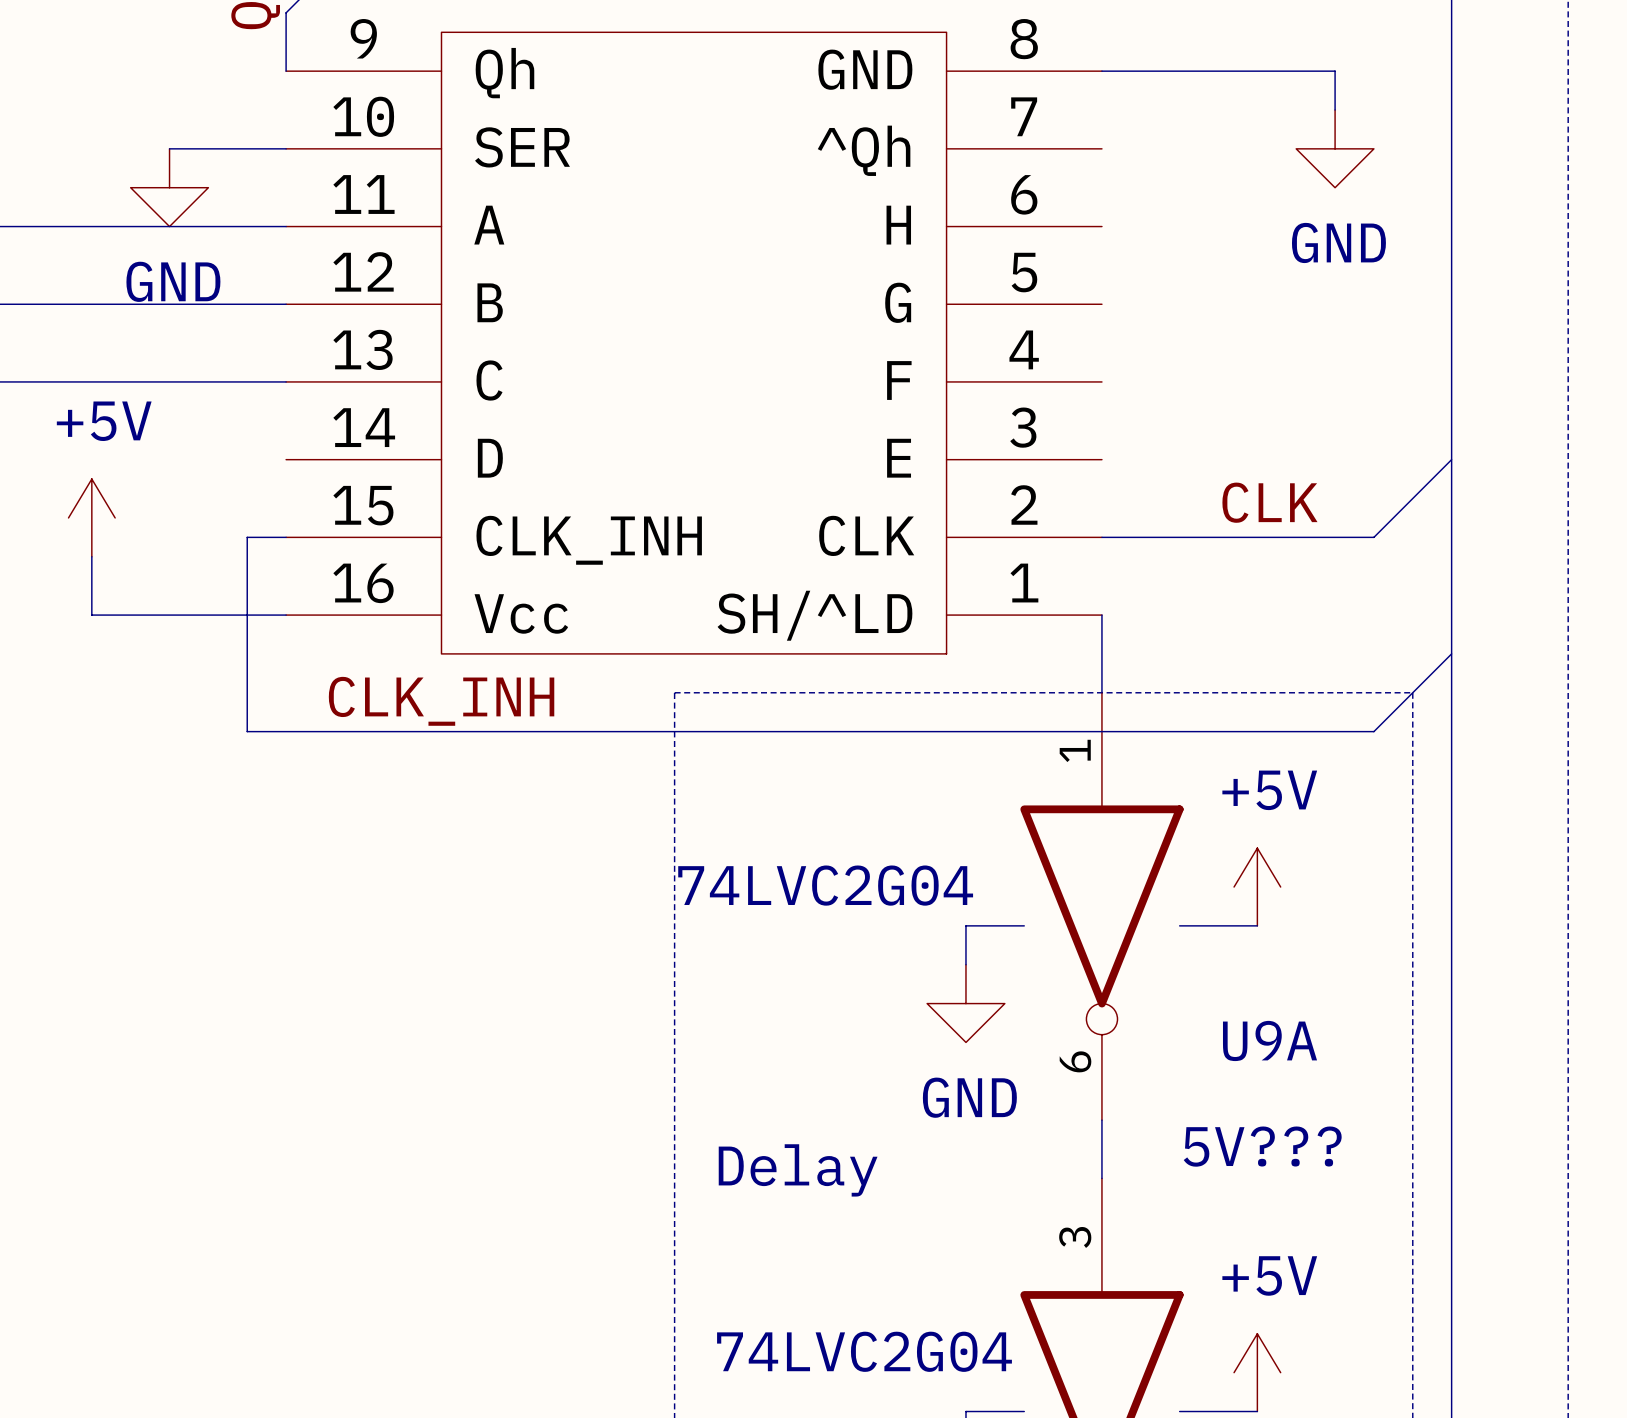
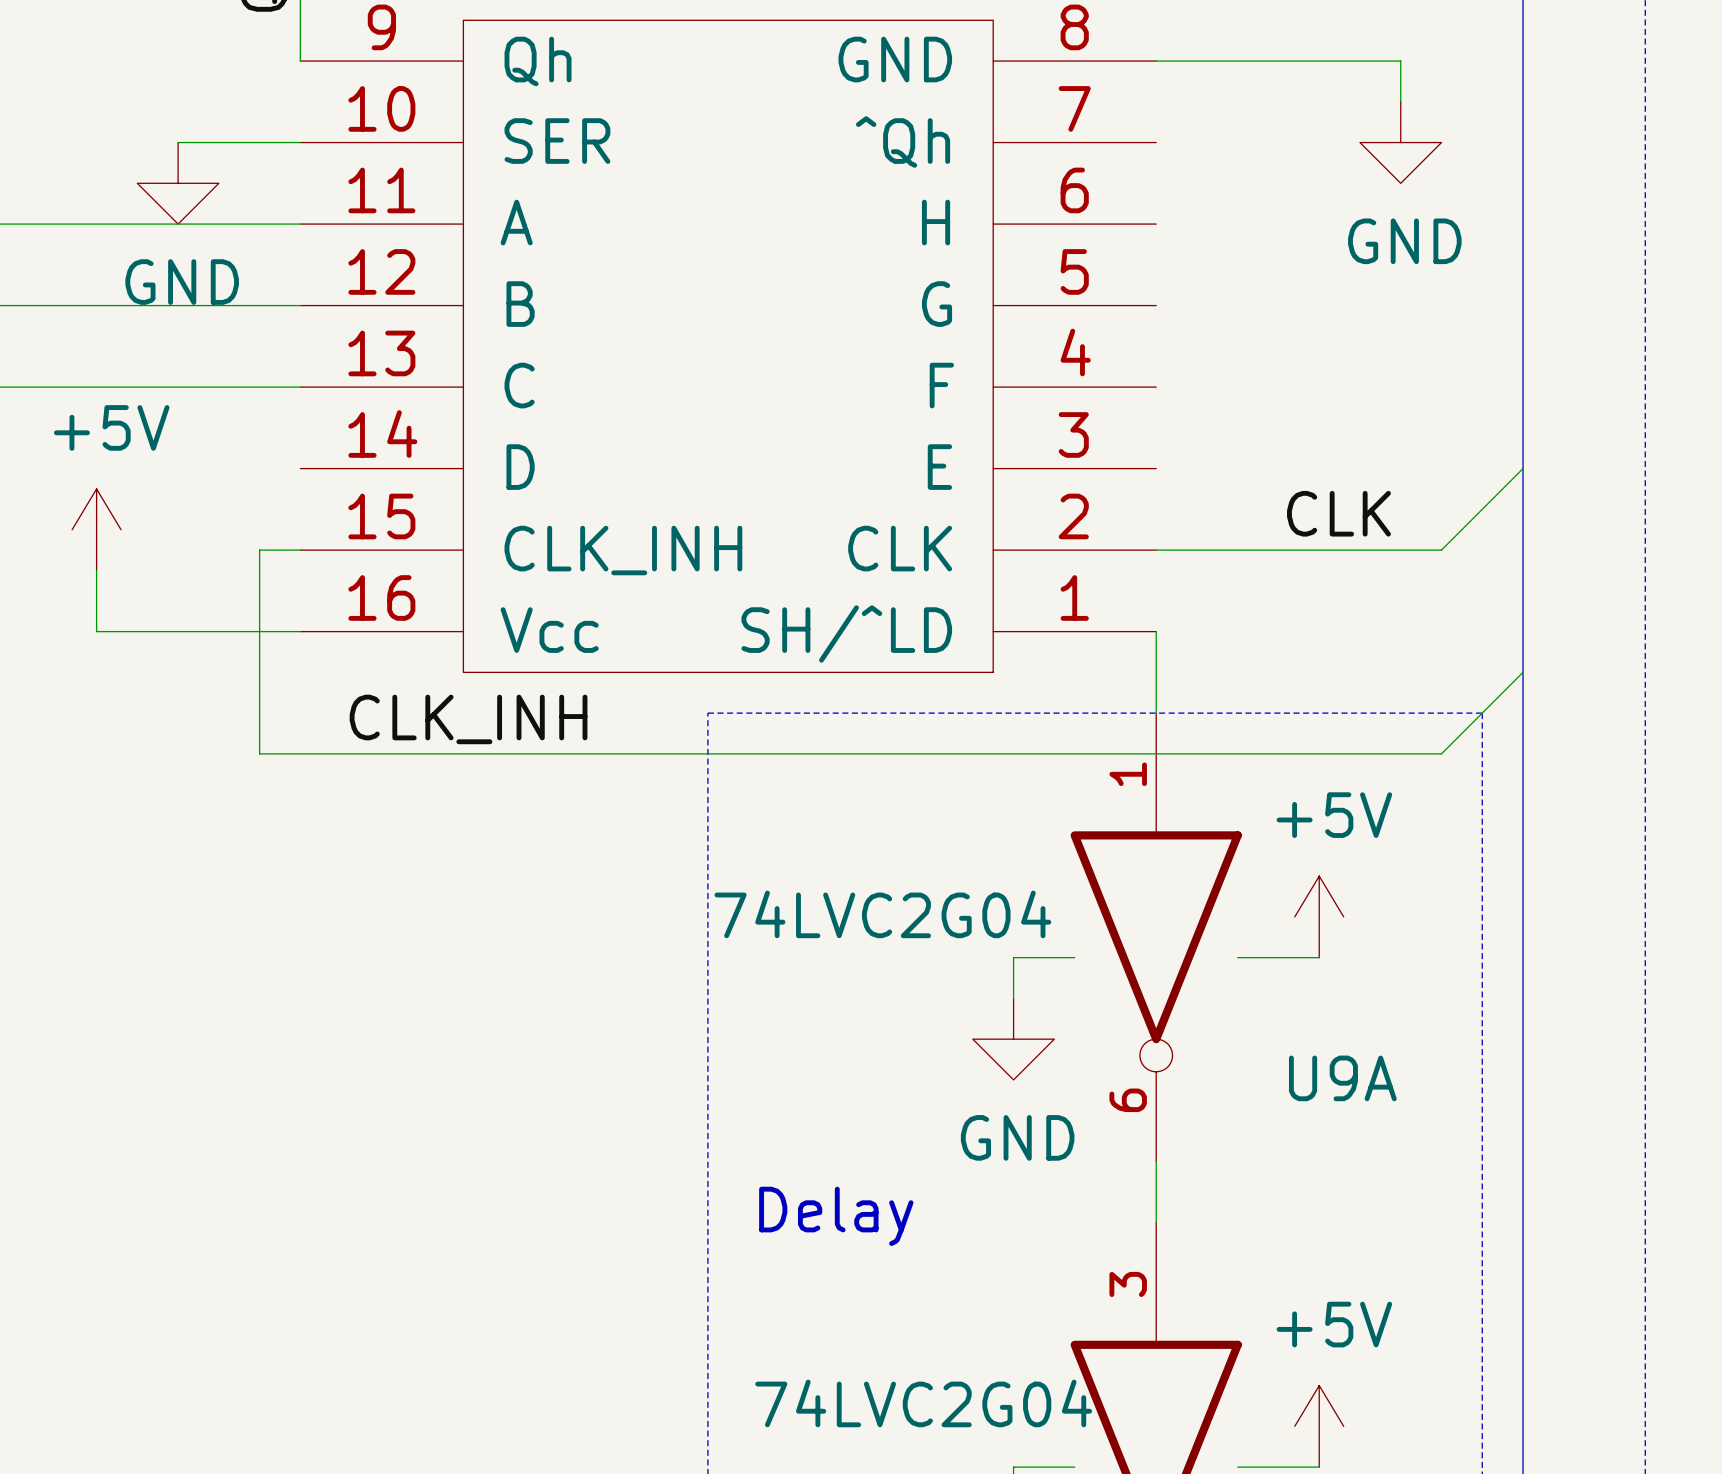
text: 5V??? (1262, 1146) -> none

